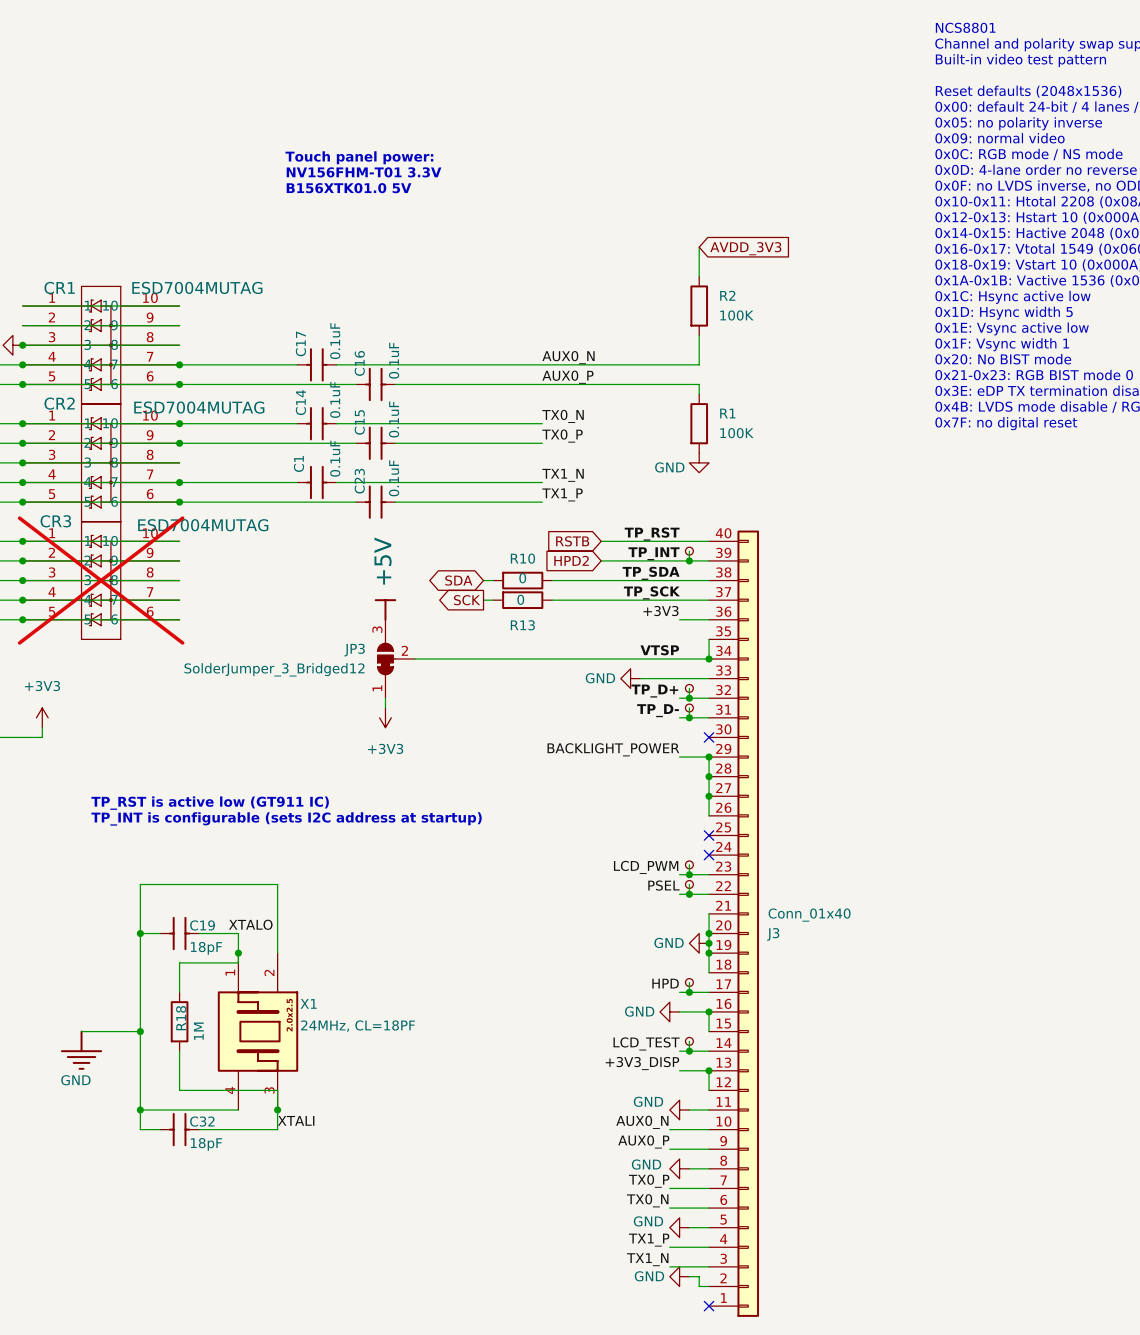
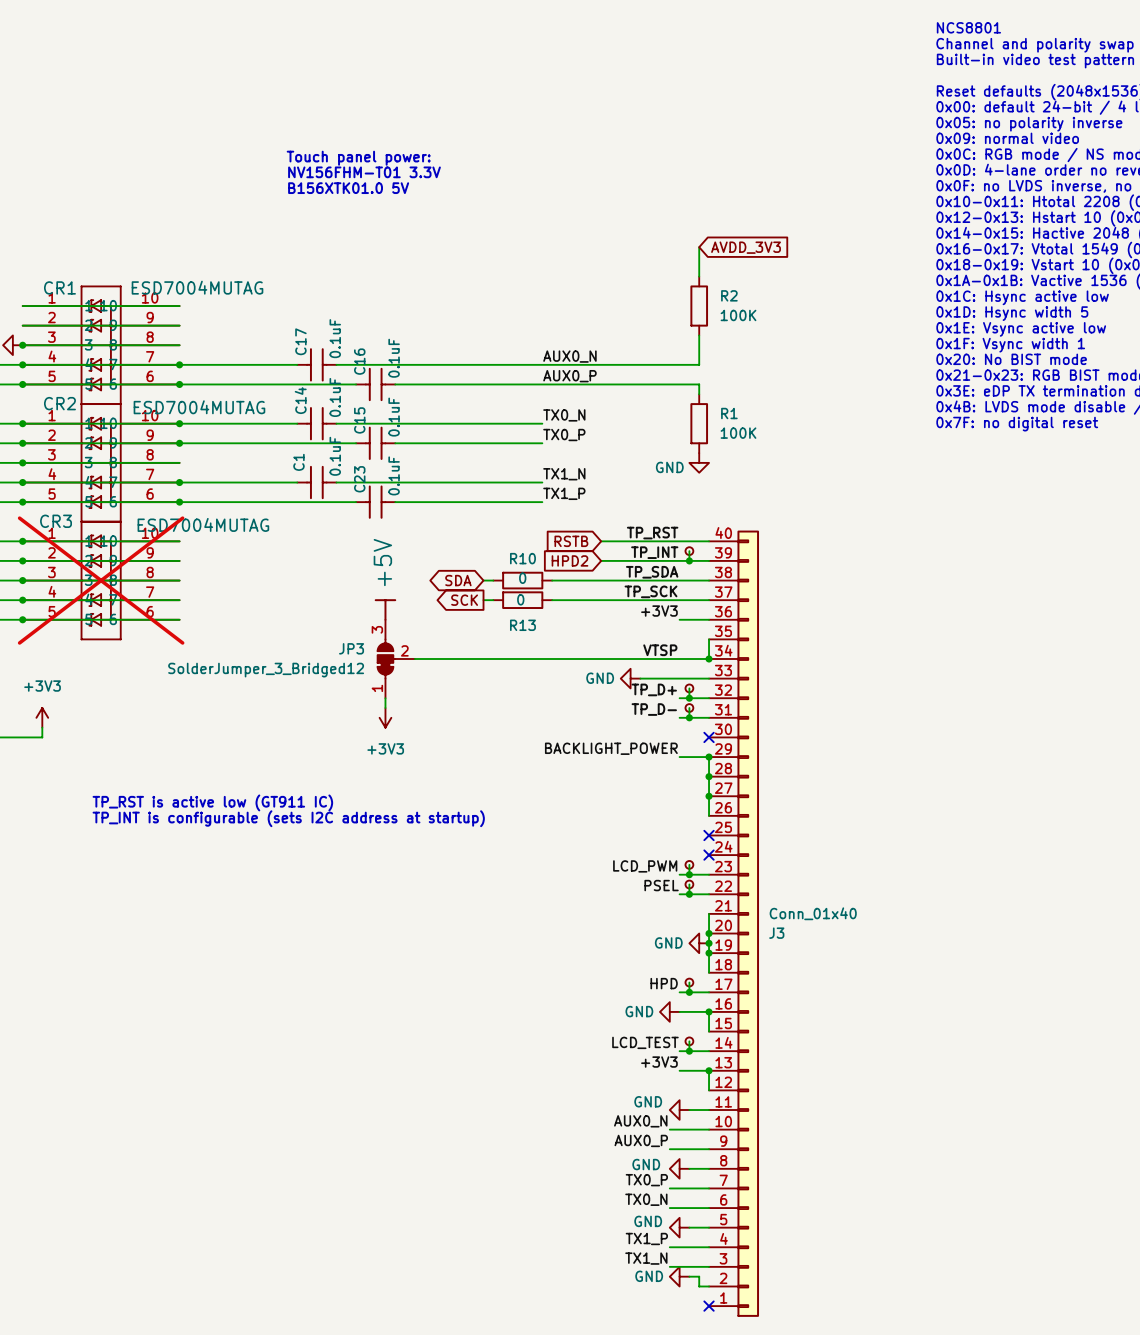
label: XTALO (250, 924) -> none
wire: (140, 933) (159, 933) -> none
junction: (140, 933) -> none
C19: 18pF (179, 933) -> none
wire: (199, 933) (238, 933) (238, 962) (179, 962) (179, 992) -> none
junction: (238, 953) -> none
wire: (277, 953) (277, 884) (140, 884) (140, 1129) (159, 1129) -> none
R18: 1M (179, 1021) -> none
wire: (81, 1031) (140, 1031) -> none
junction: (140, 1031) -> none
X1: 24MHz, CL=18PF (258, 1031) -> none
power symbol: GND (81, 1050) -> none
wire: (179, 1051) (179, 1090) (277, 1090) (277, 1129) (199, 1129) -> none
label: +3V3_DISP (642, 1063) -> +3V3 (659, 1062)
wire: (140, 1110) (238, 1110) -> none
junction: (140, 1110) -> none
junction: (277, 1110) -> none
label: XTALI (296, 1120) -> none
C32: 18pF (179, 1129) -> none

